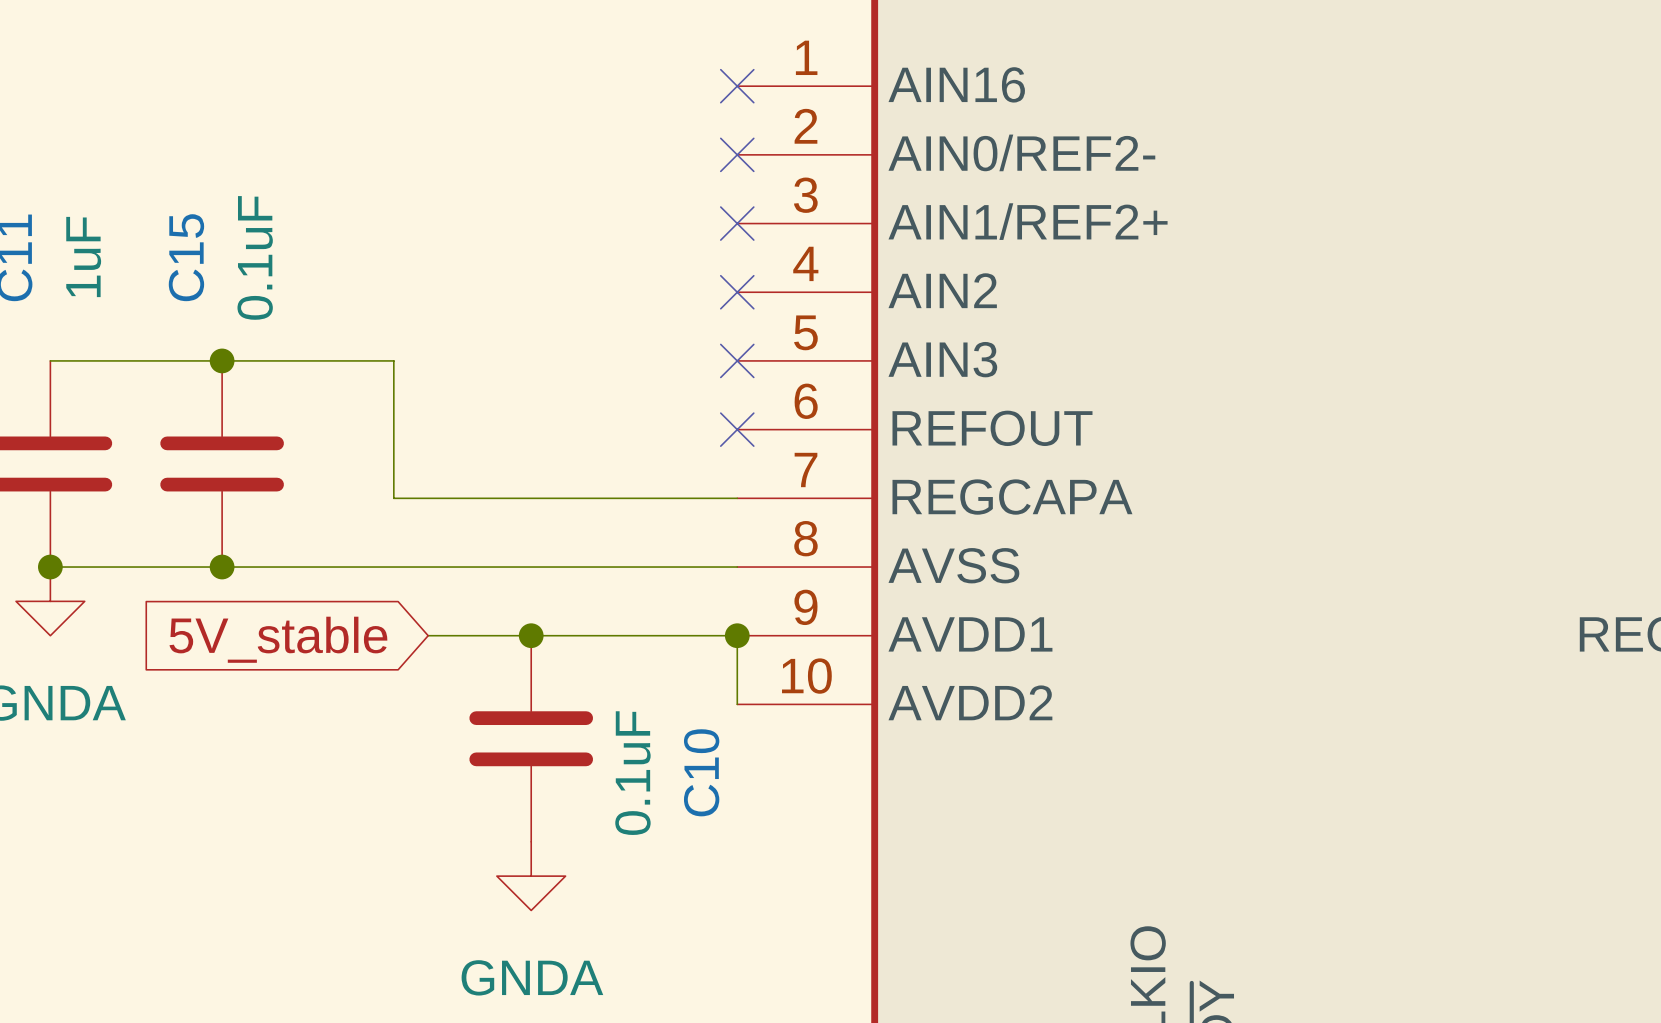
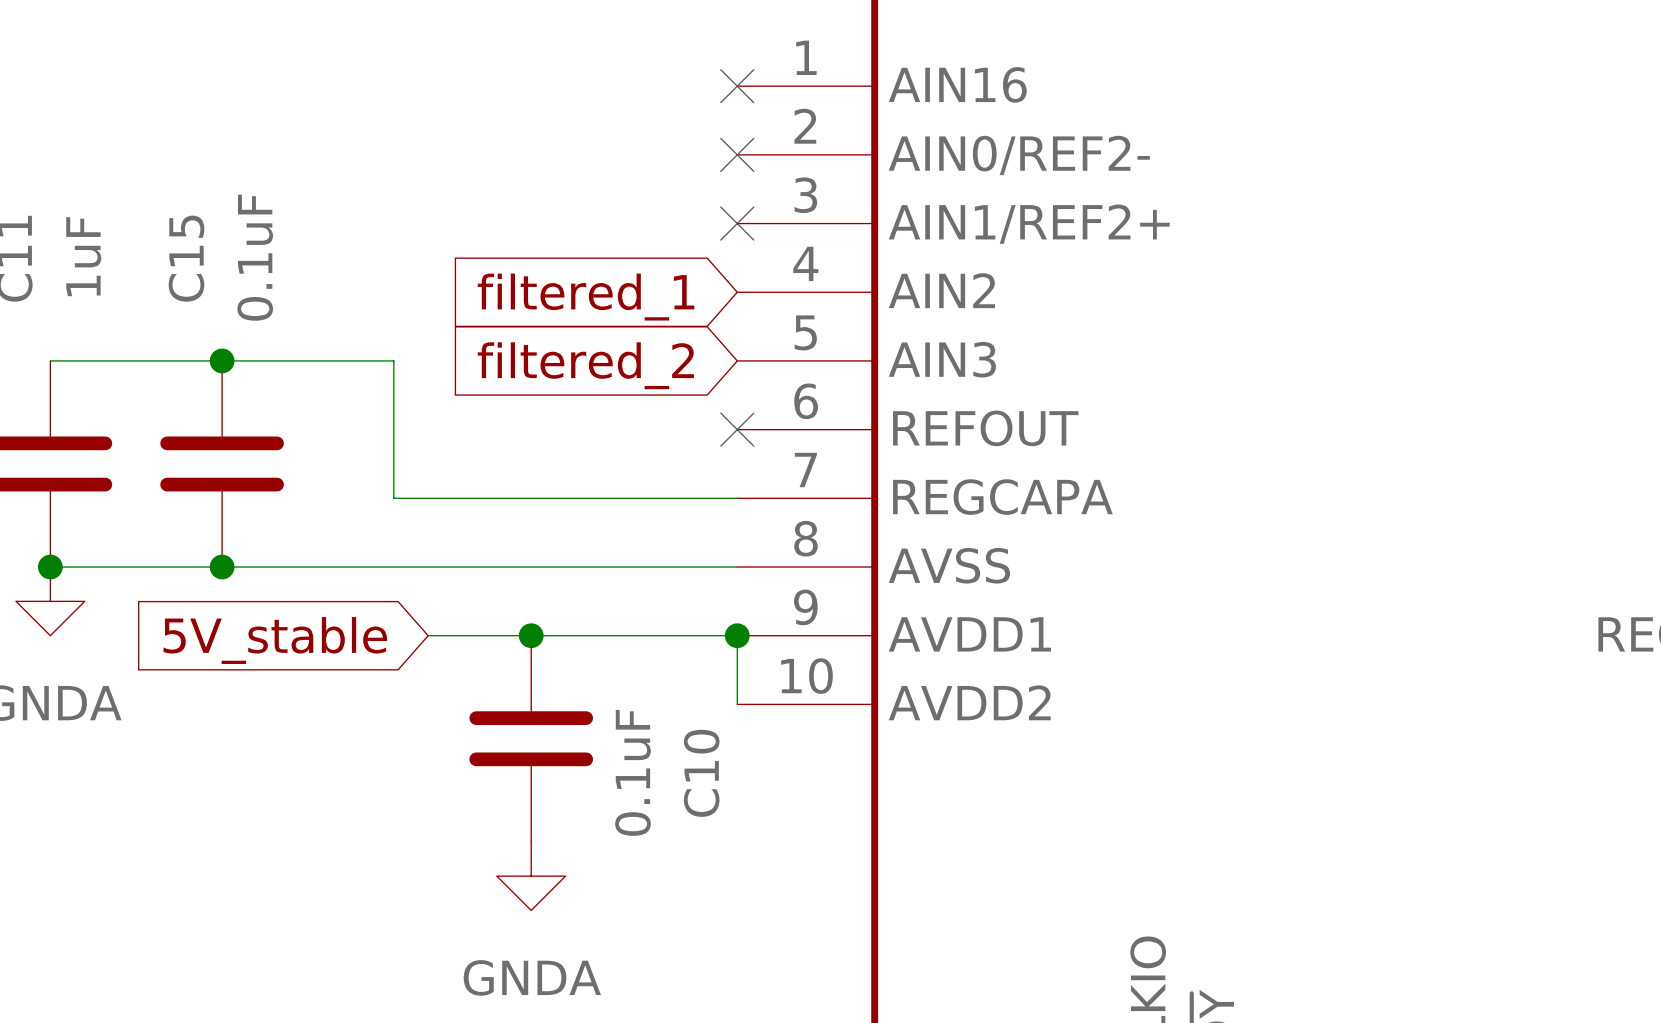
no-connect mark: (737, 292) -> none
global label: none -> filtered_1 (586, 297)
no-connect mark: (737, 360) -> none
global label: none -> filtered_2 (585, 365)

